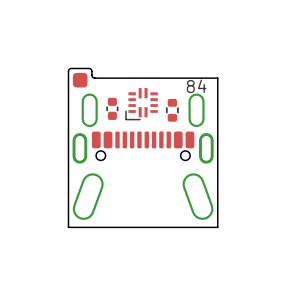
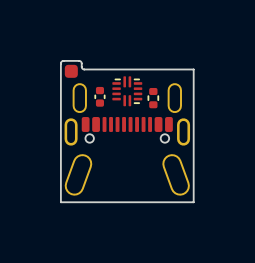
text: 84 (196, 86) -> none
part footprint: [125, 87, 158, 121] -> [112, 76, 143, 107]

